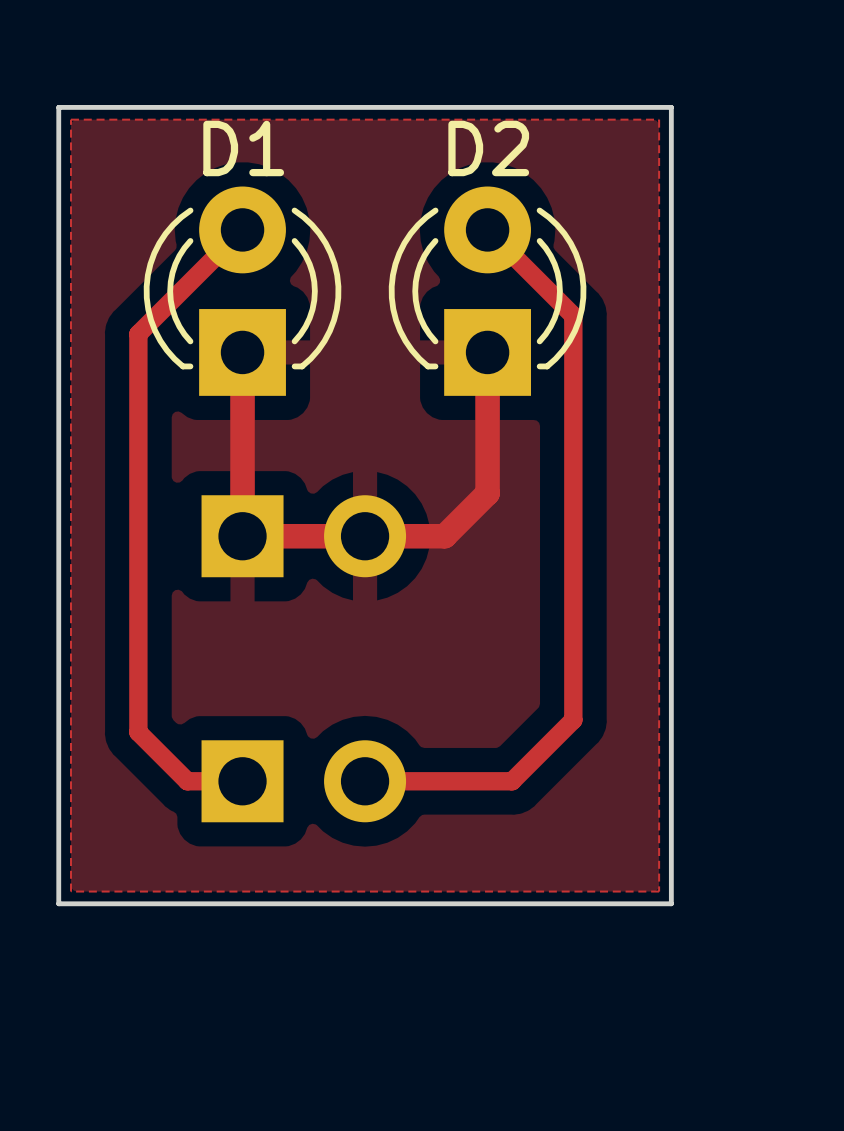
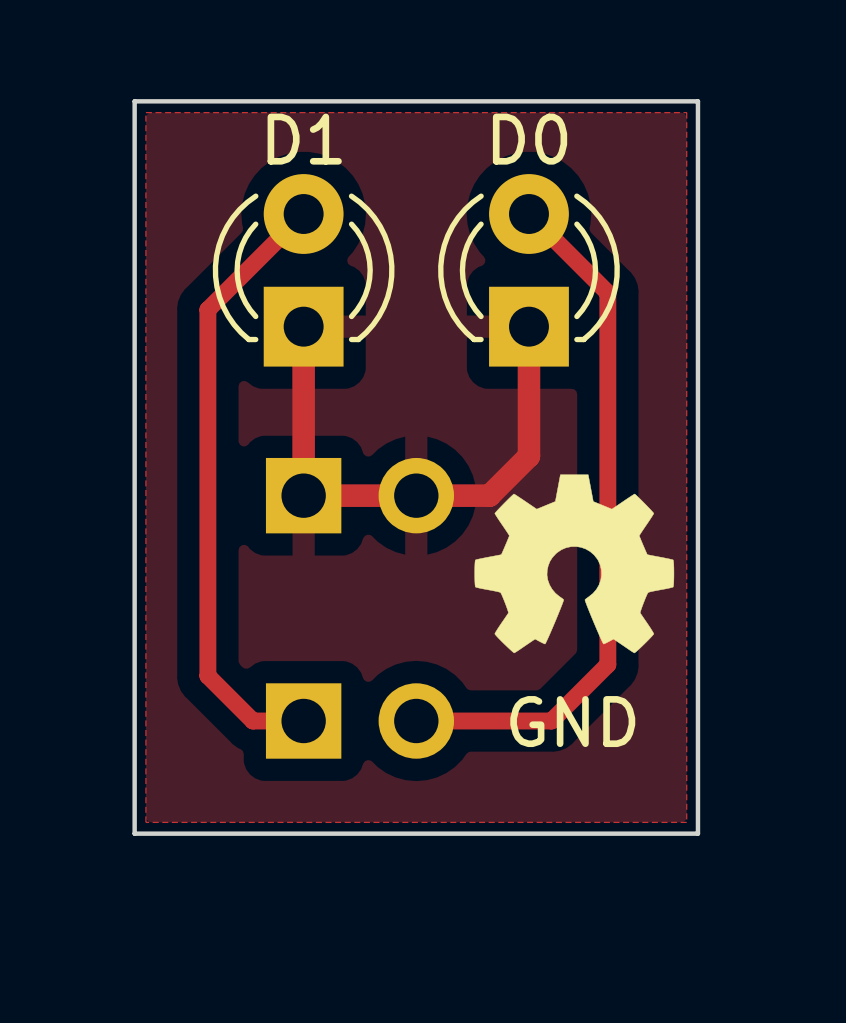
D2 name: D2 (488, 148) -> D0 (530, 139)
drawing: none -> [474, 474, 675, 654]
text: none -> GND (572, 721)

